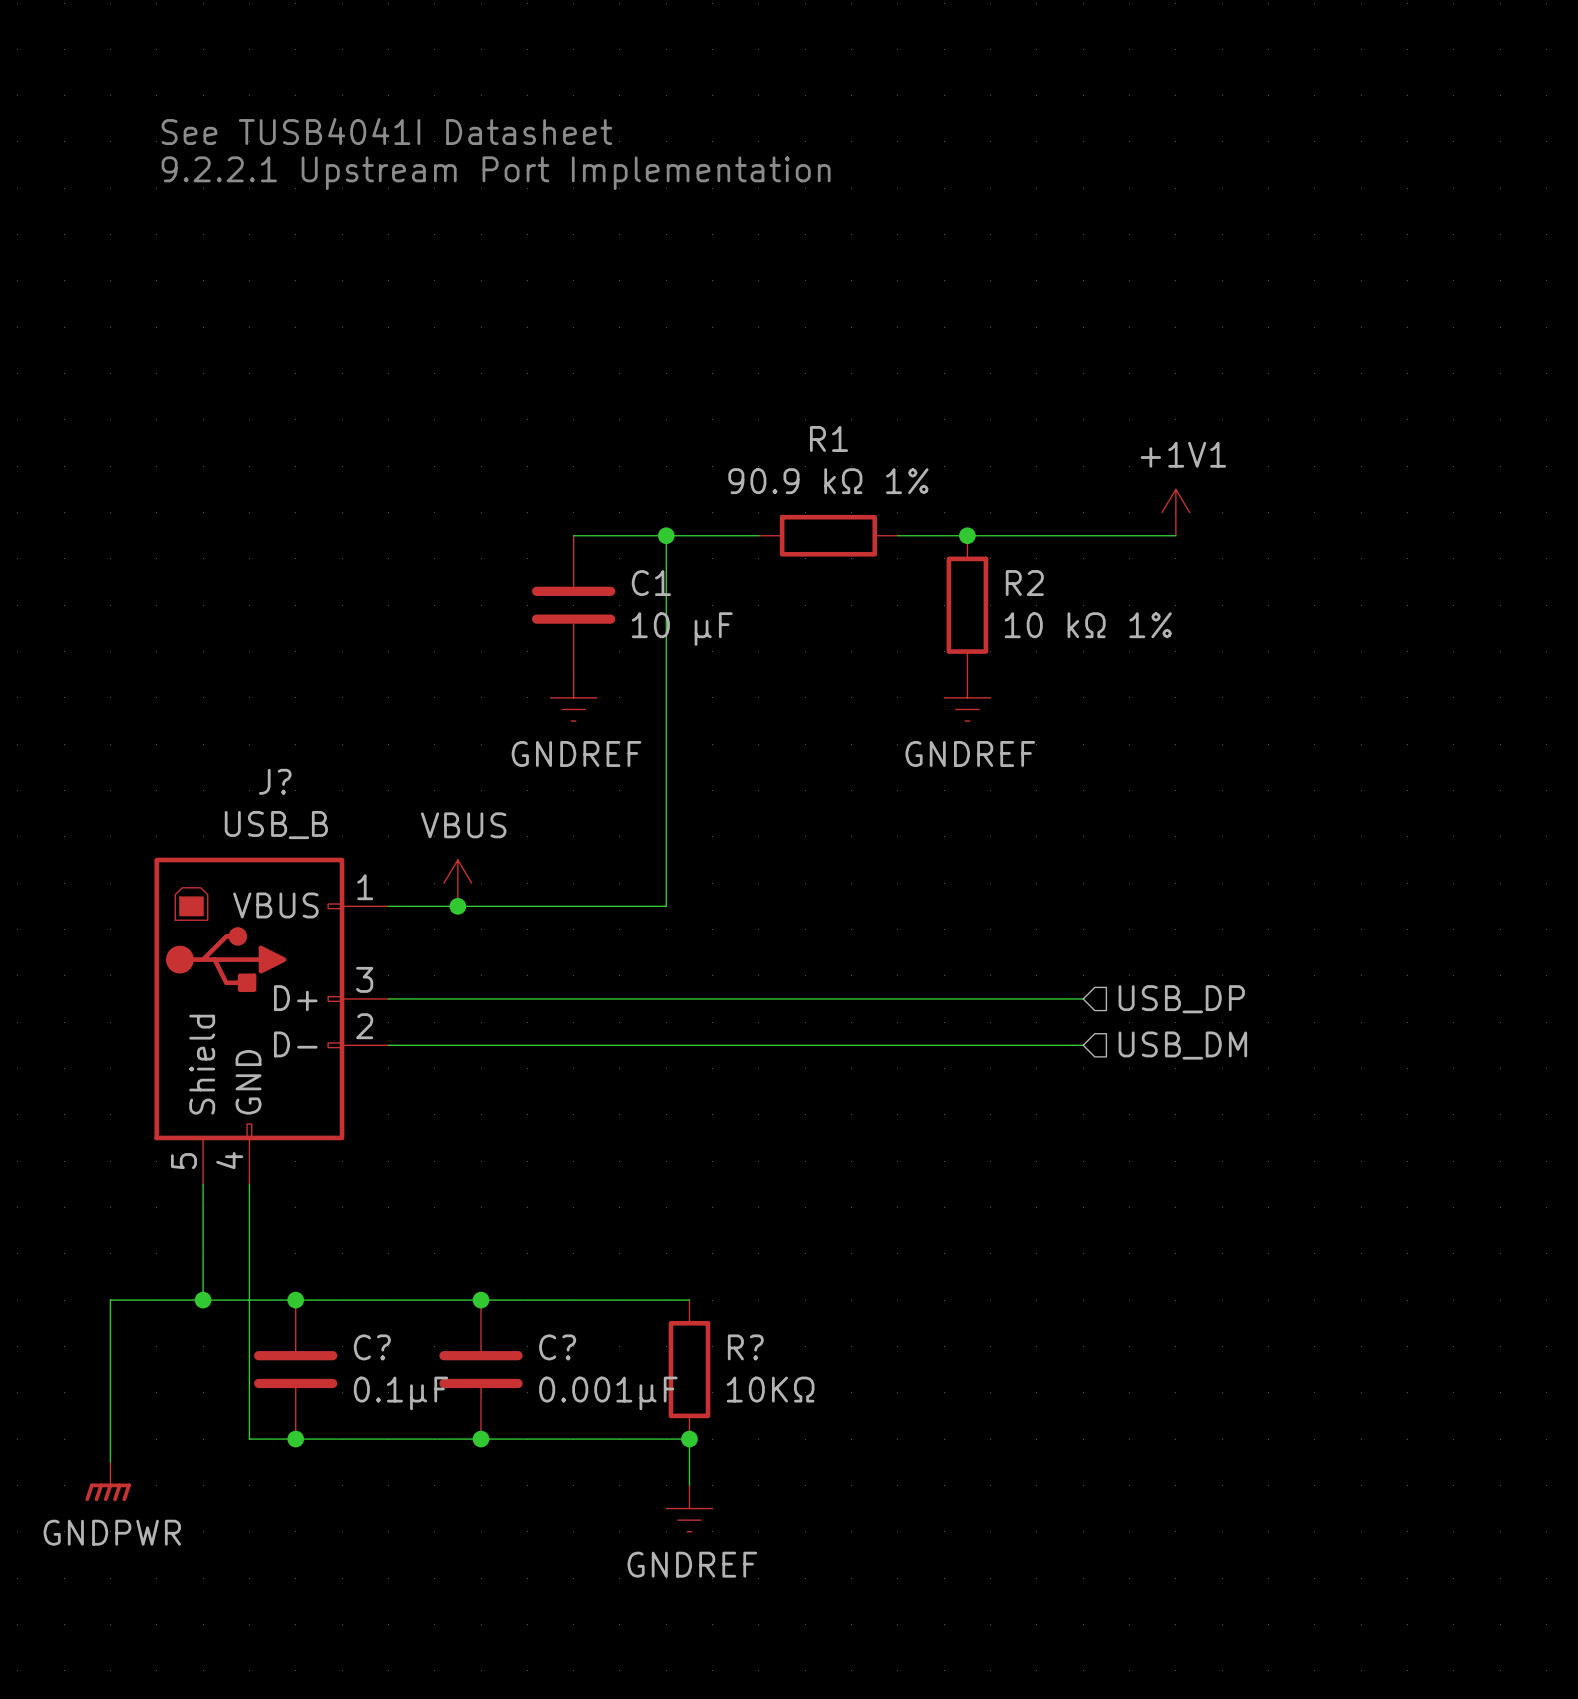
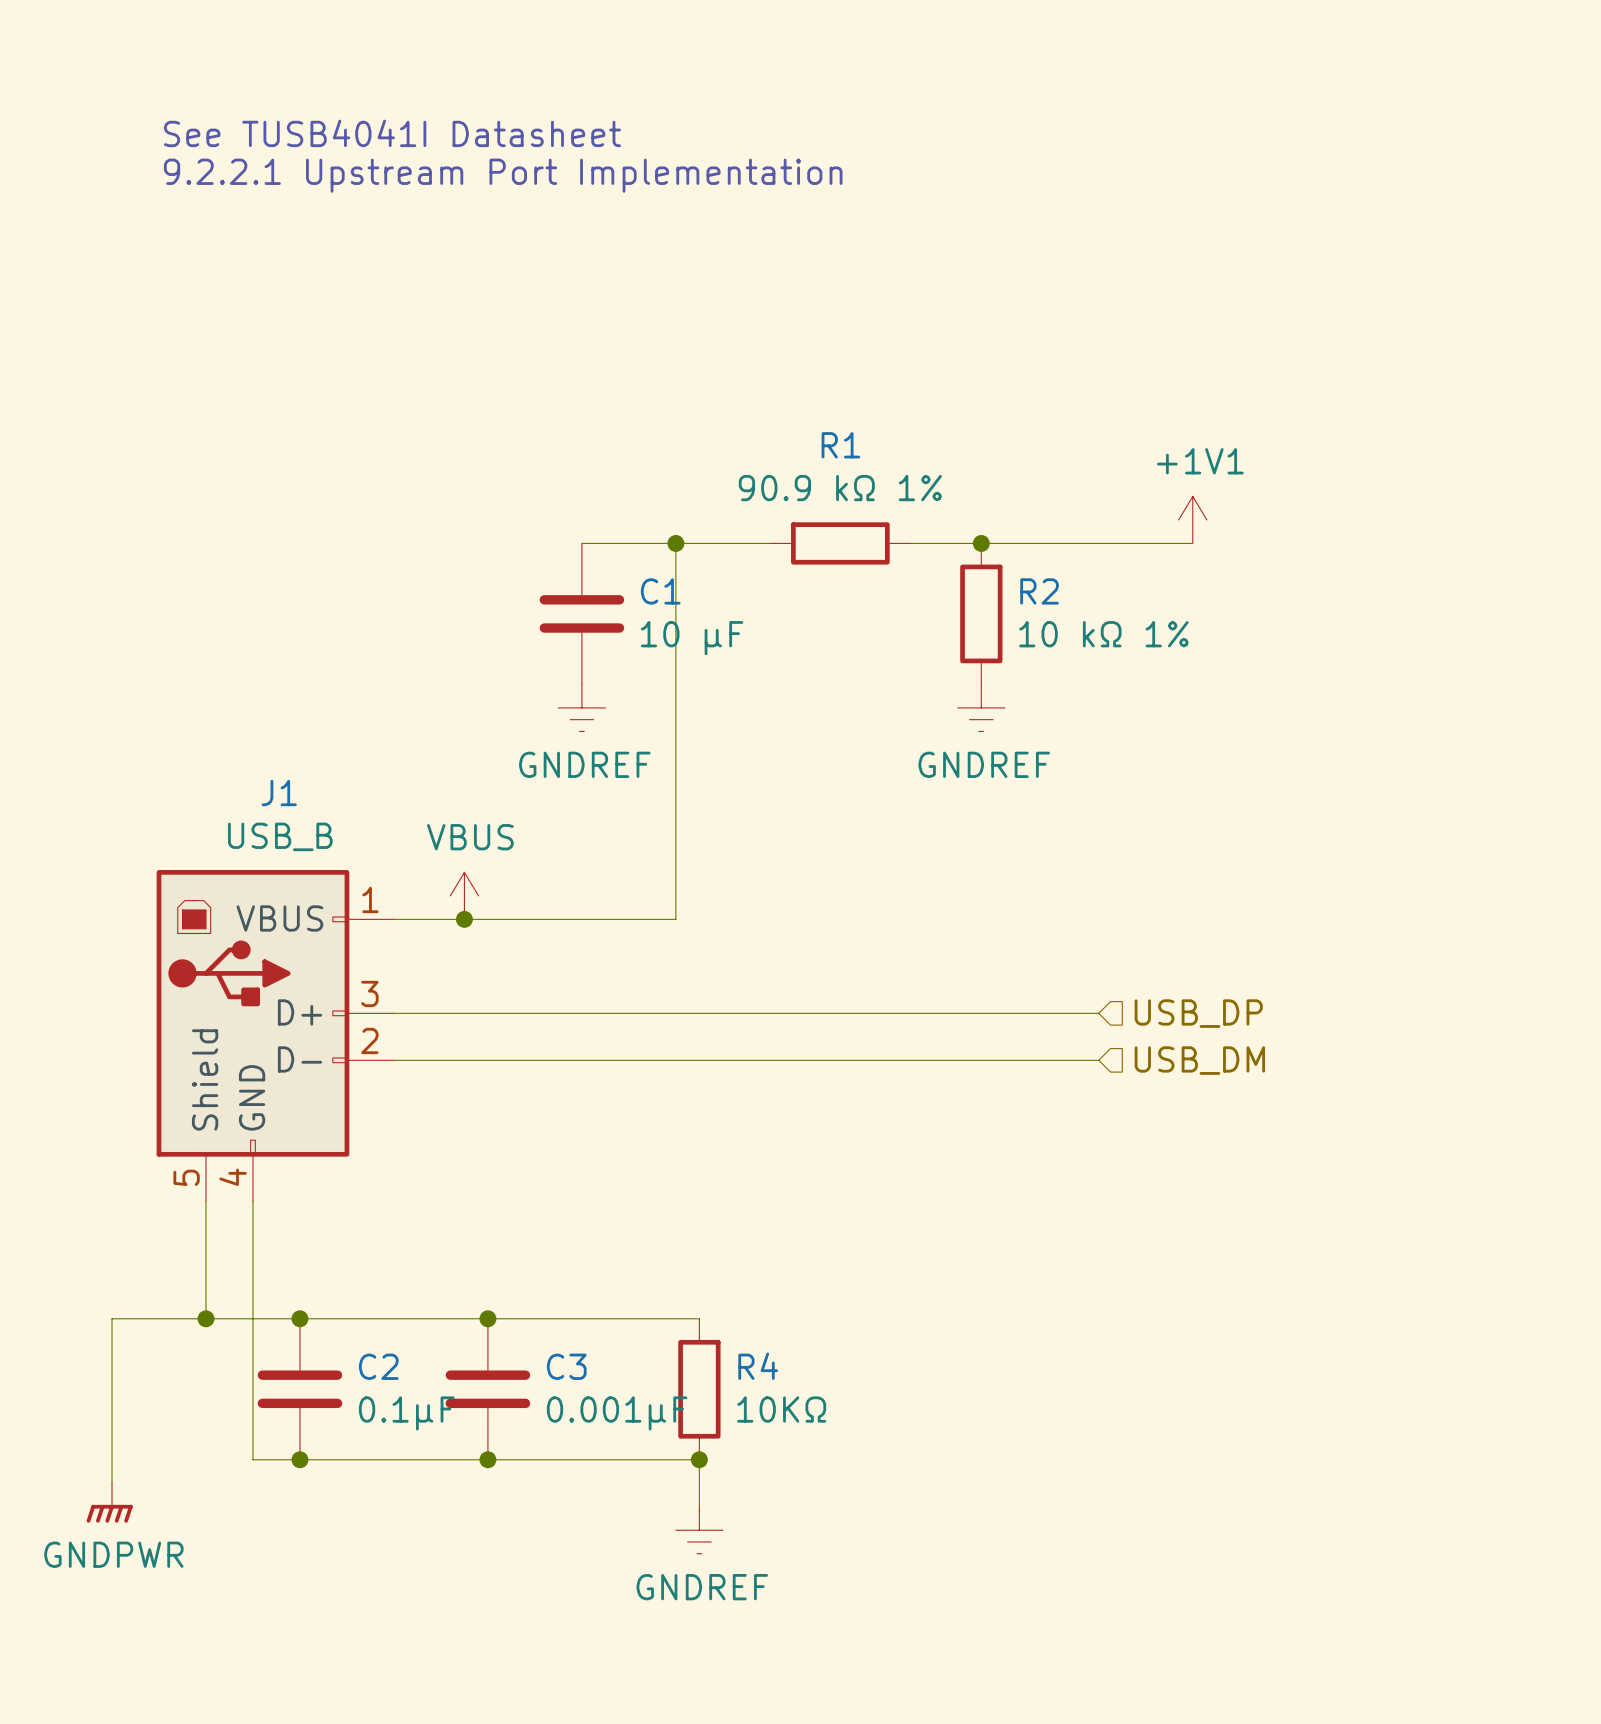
J? name: J? (275, 781) -> J1 (279, 793)
C? name: C? (372, 1347) -> C2 (378, 1366)
C? name: C? (557, 1347) -> C3 (566, 1366)
R? name: R? (745, 1347) -> R4 (758, 1366)

